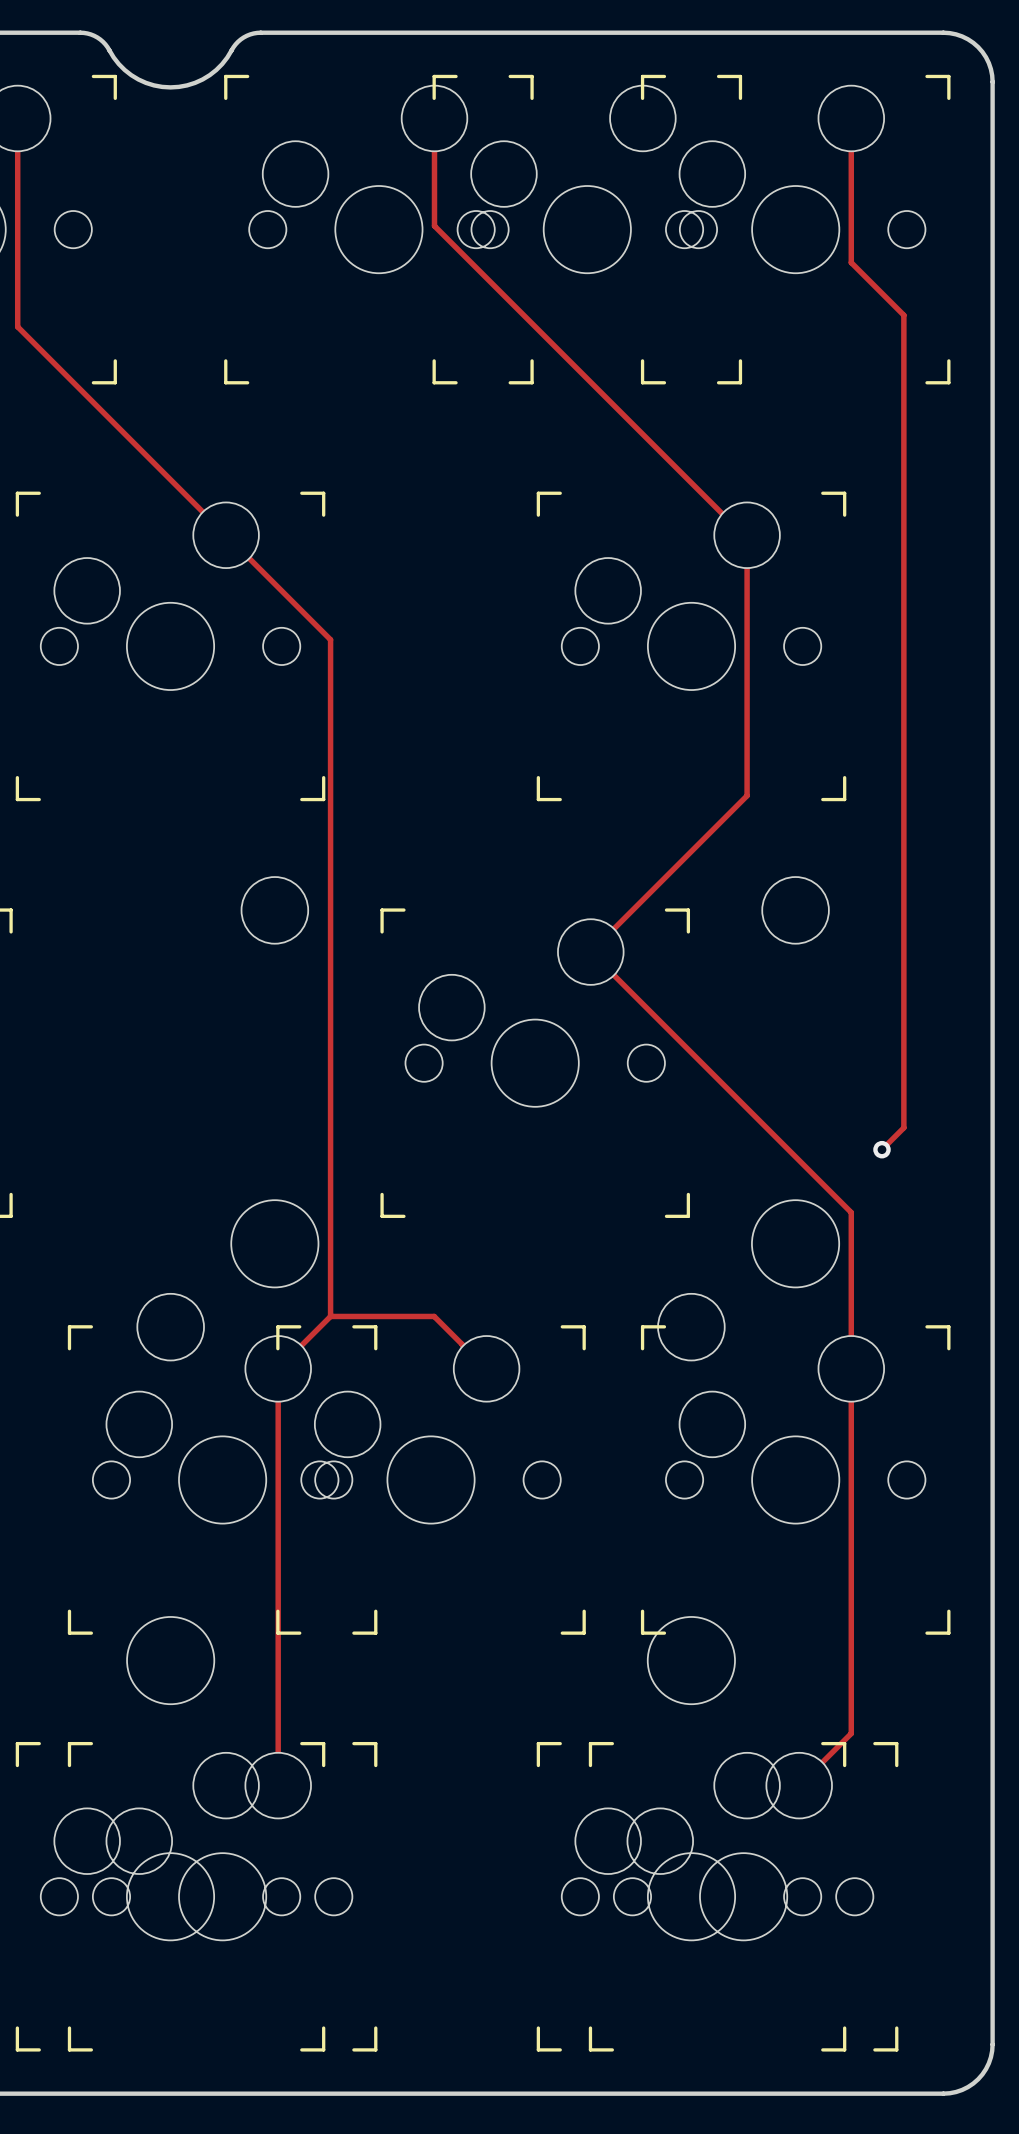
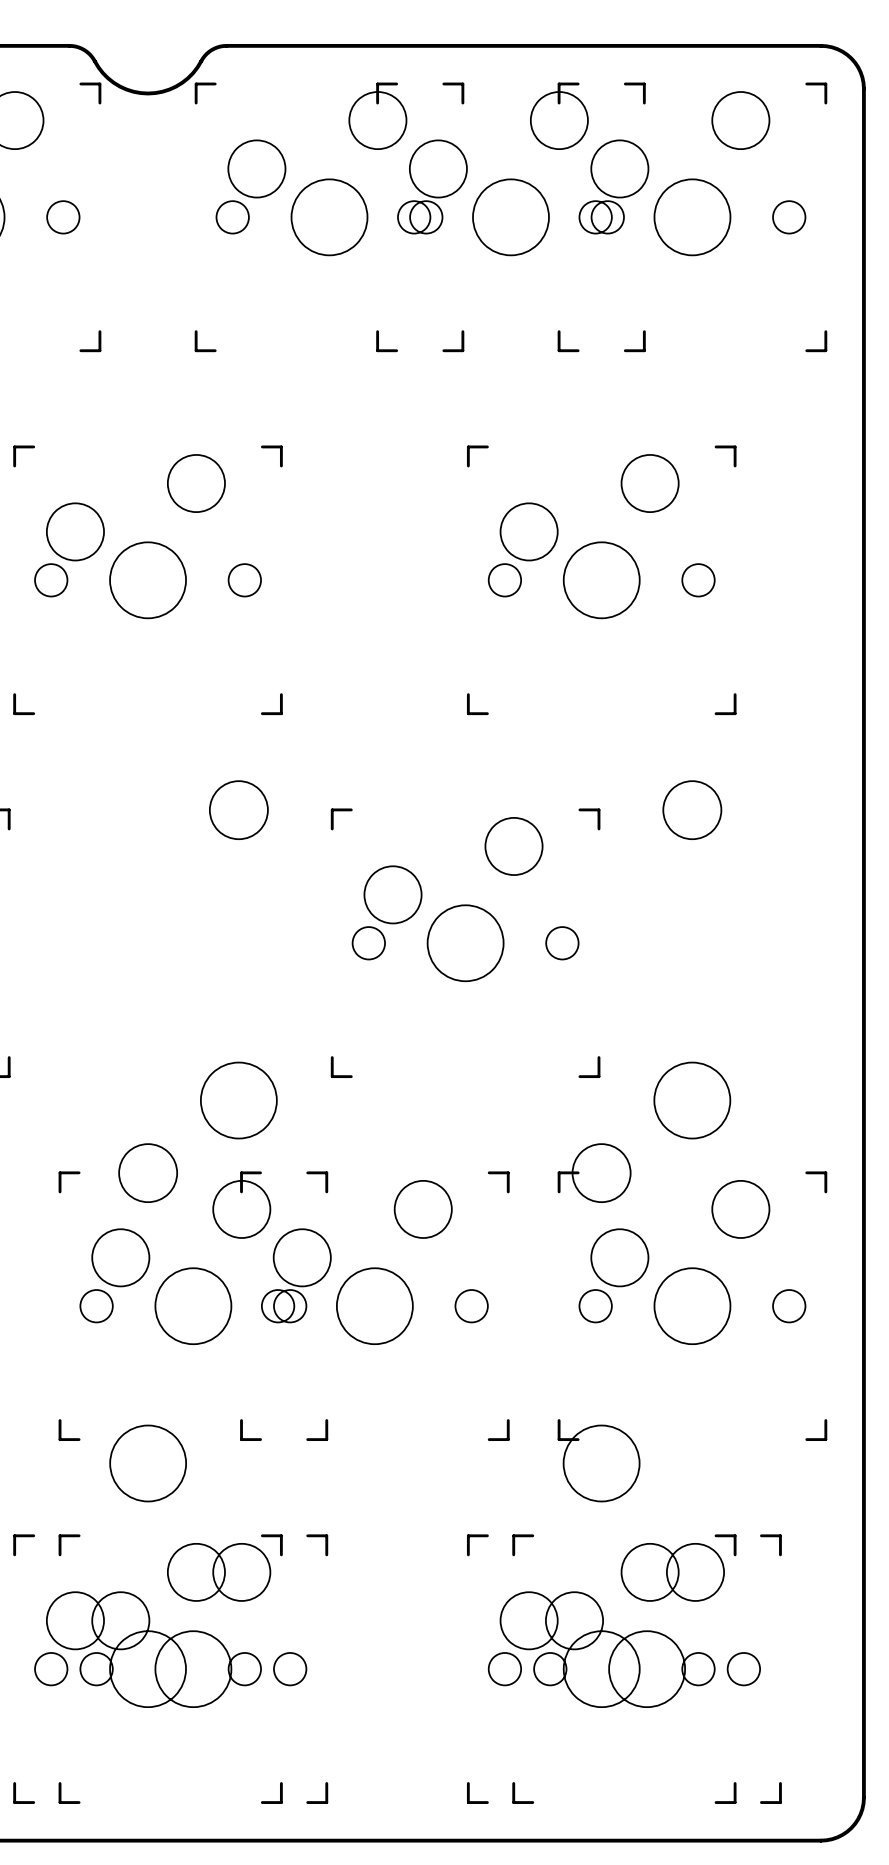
track: (17, 118) (17, 326) (330, 639) (330, 1316) -> none
track: (434, 118) (434, 225) (743, 535) -> none
track: (851, 118) (851, 262) (903, 315) (903, 1127) (881, 1149) -> none
track: (747, 535) (747, 795) (590, 952) (851, 1212) (851, 1733) (799, 1785) -> none
via: (881, 1149) -> none
track: (330, 1316) (278, 1368) (278, 1785) -> none
track: (330, 1316) (434, 1316) (486, 1368) -> none

